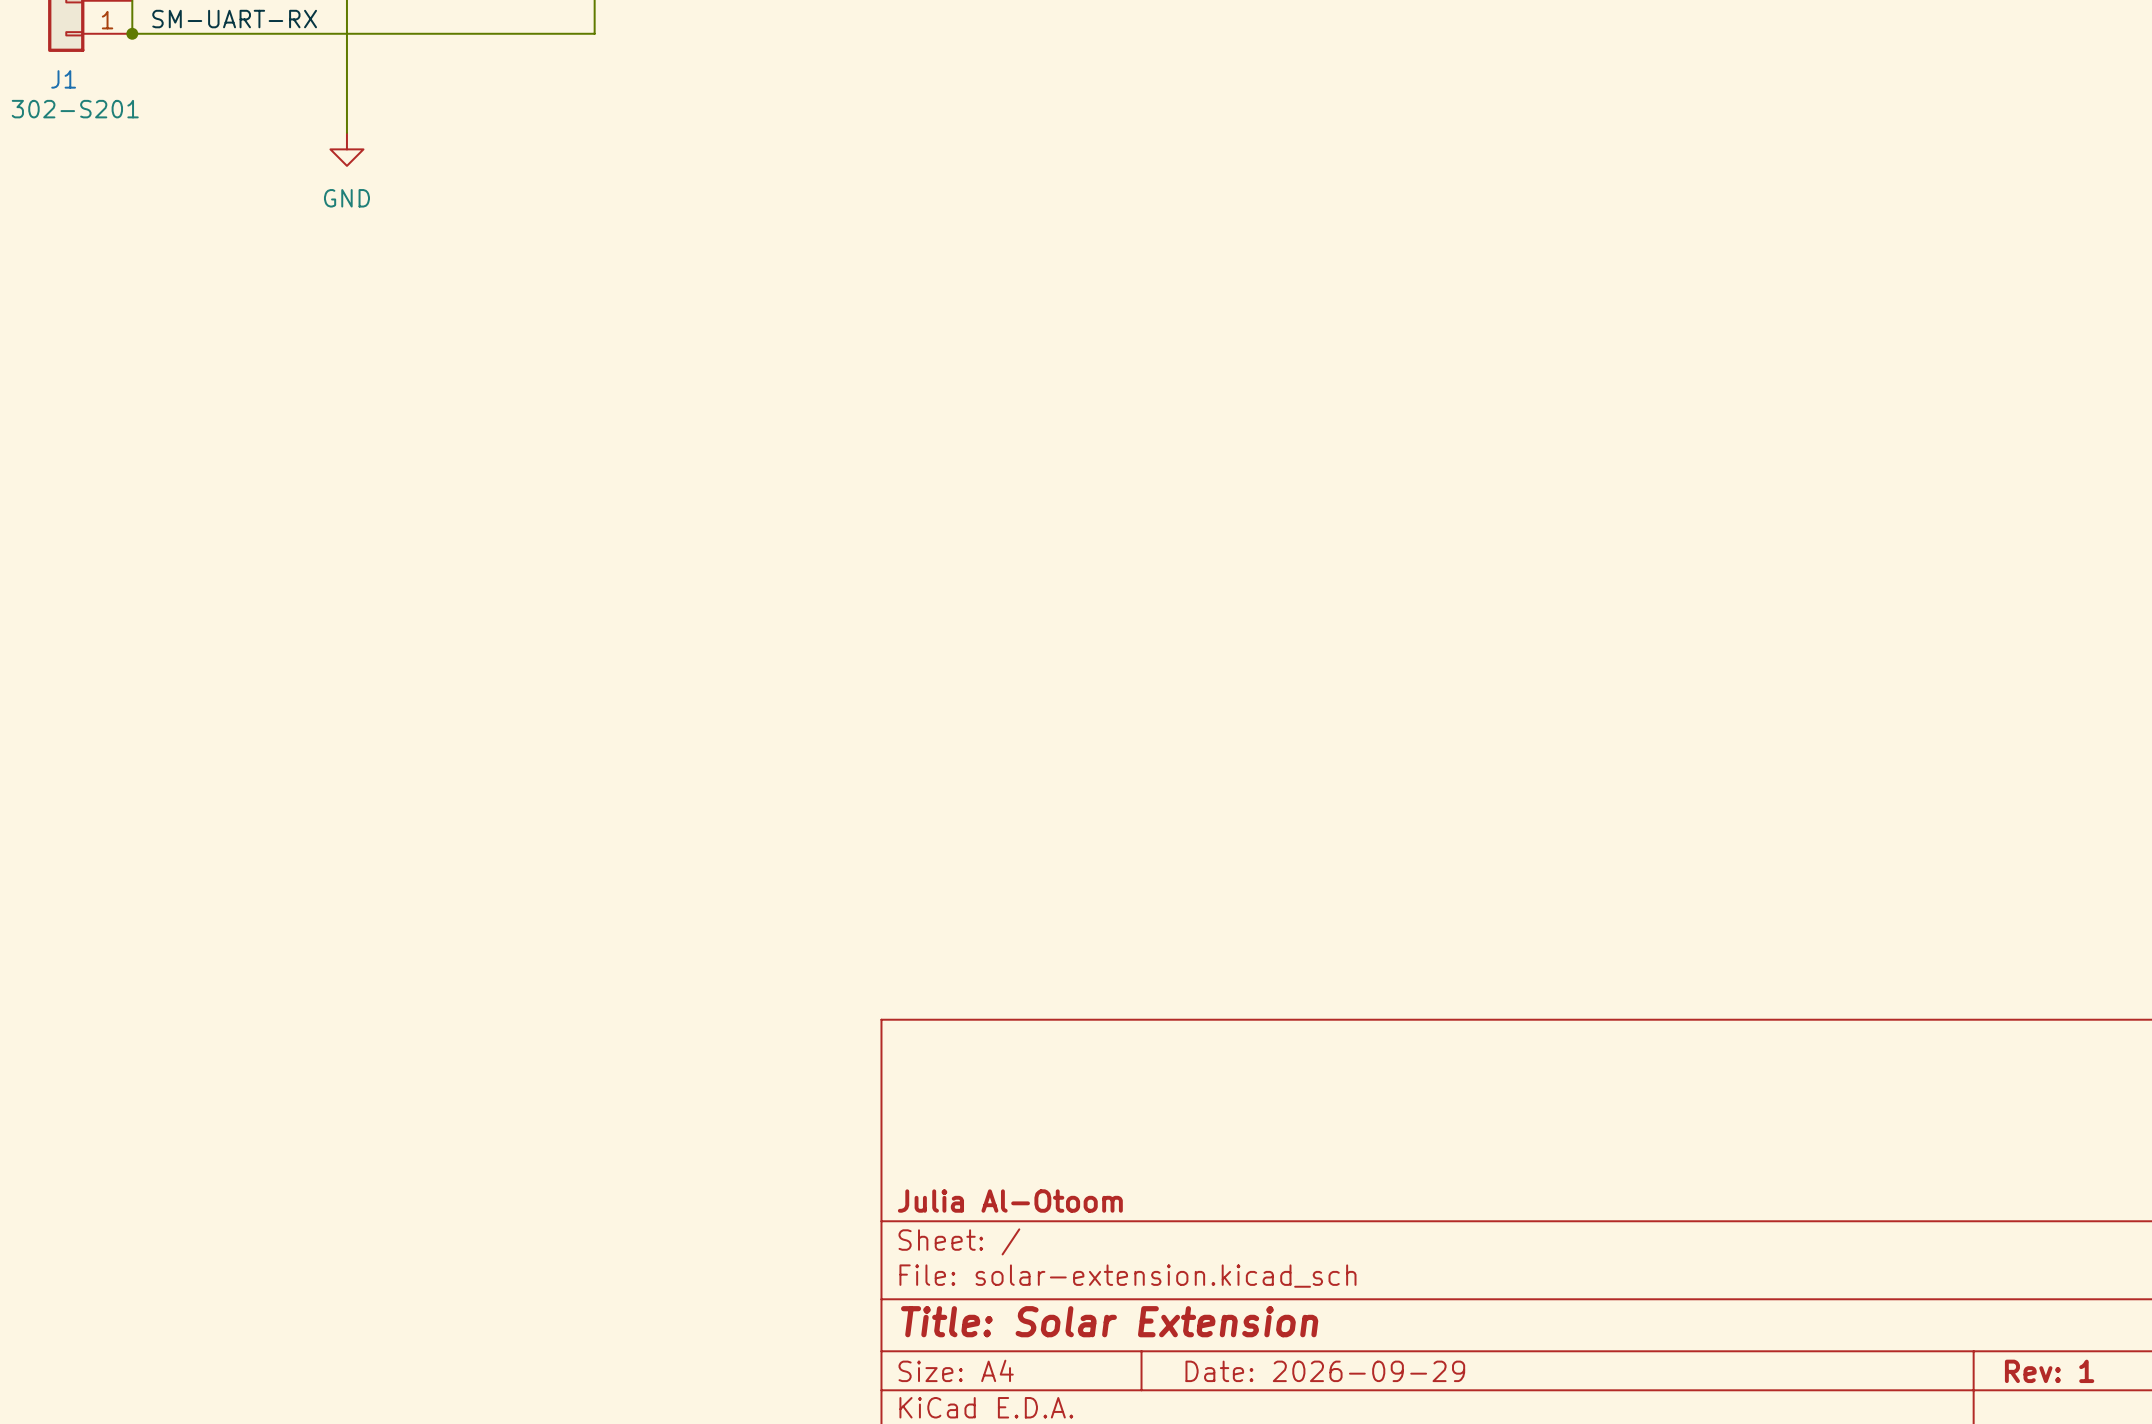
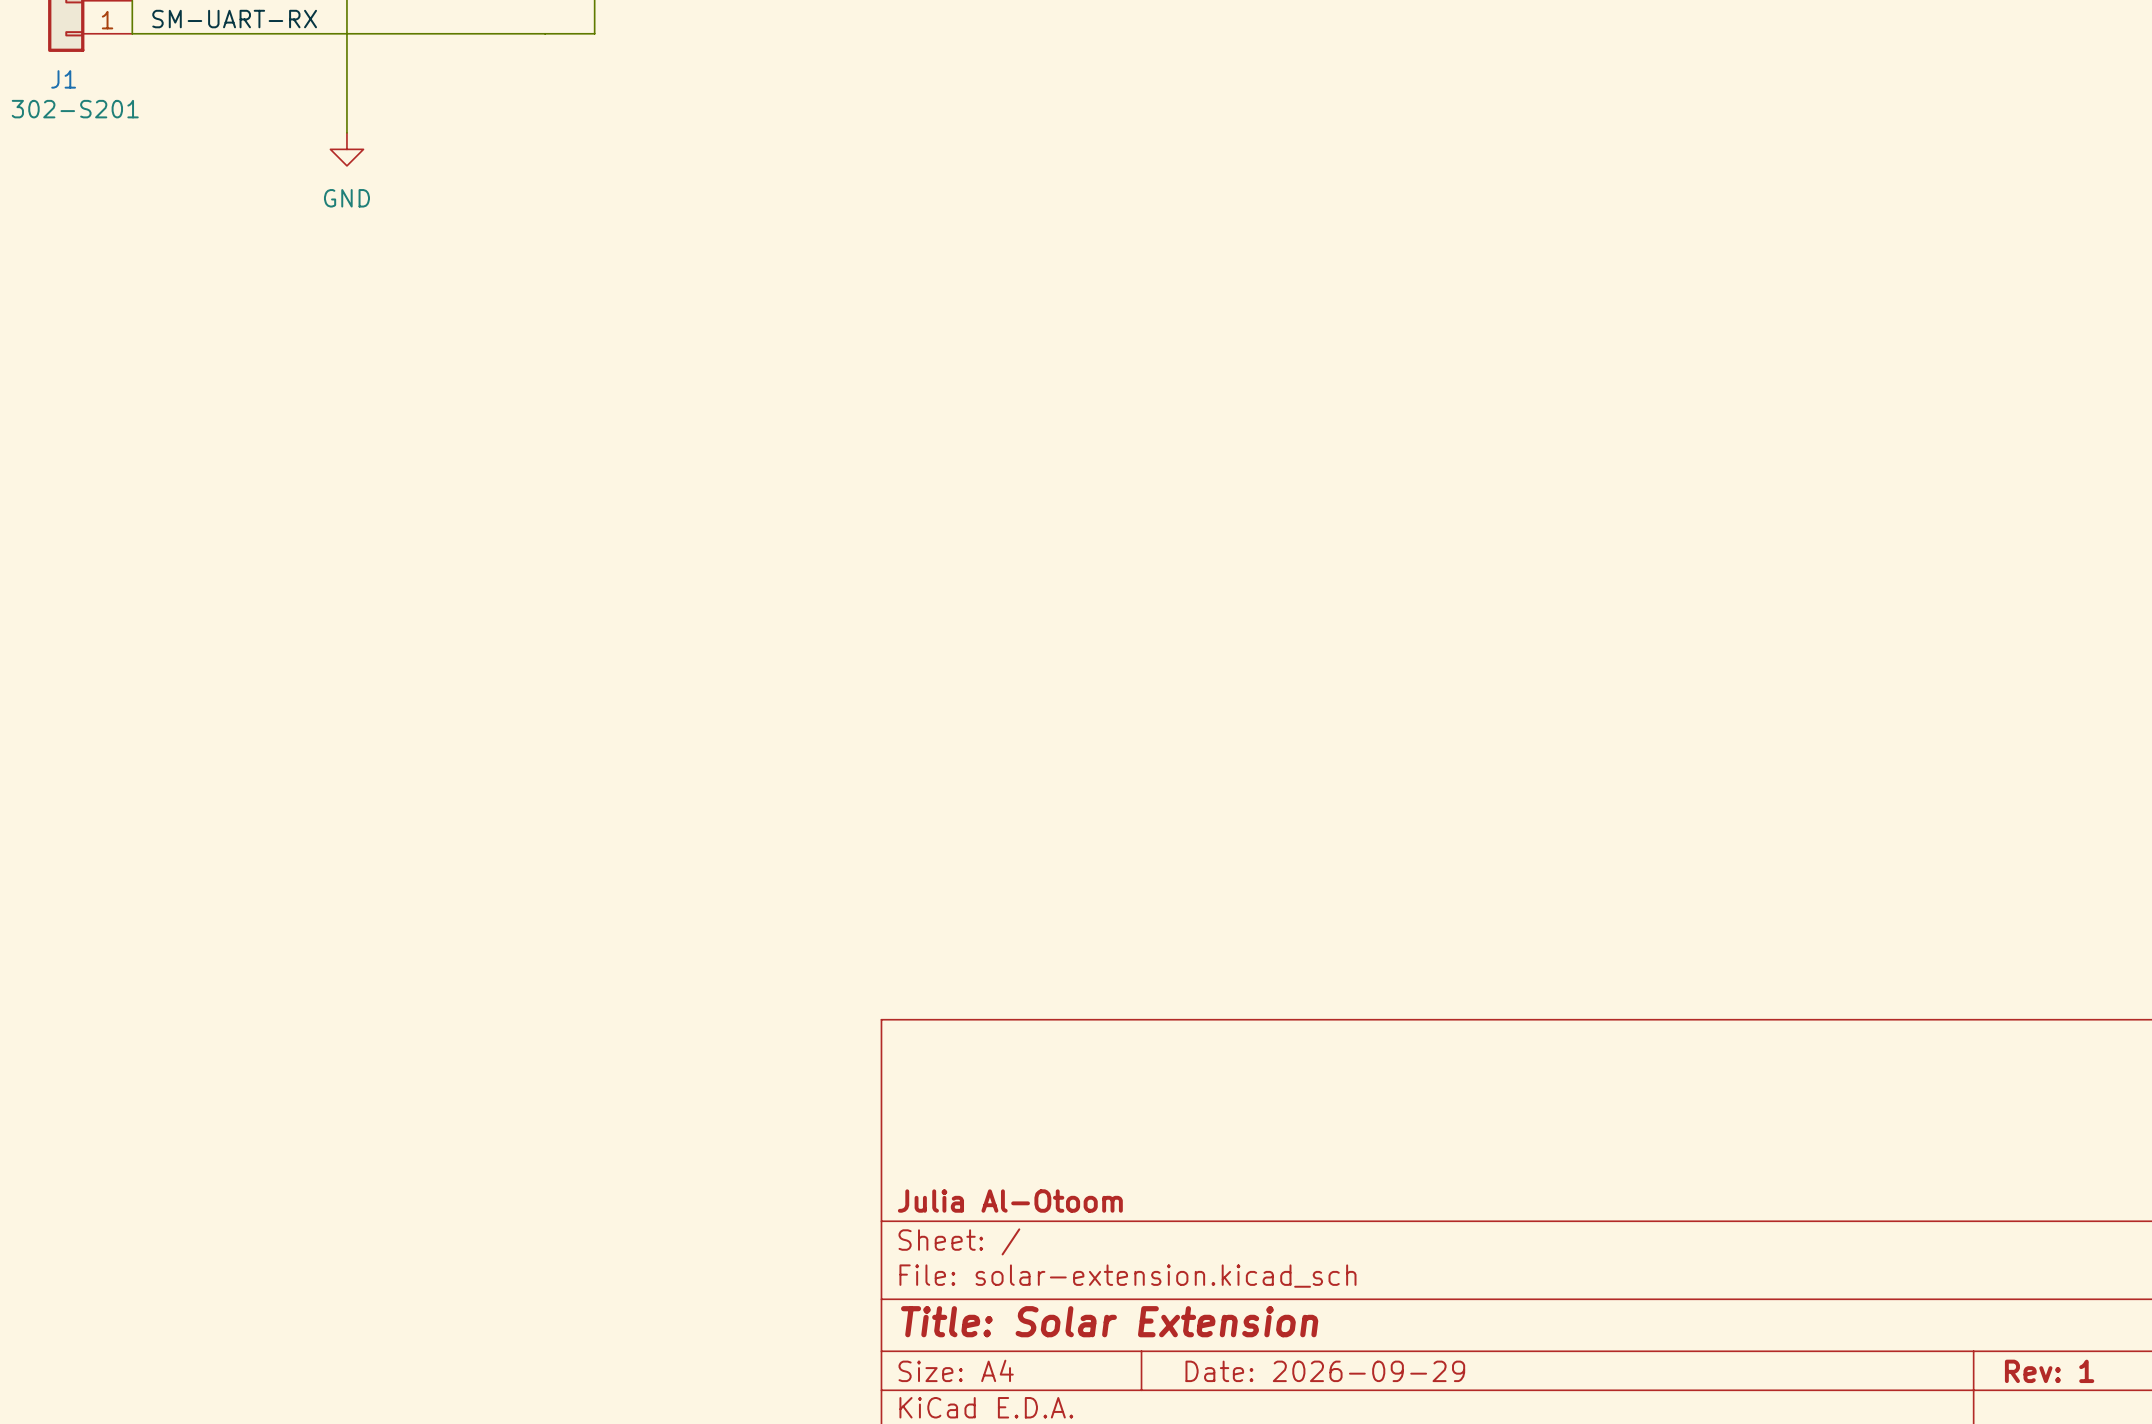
junction: (132, 33) -> none

